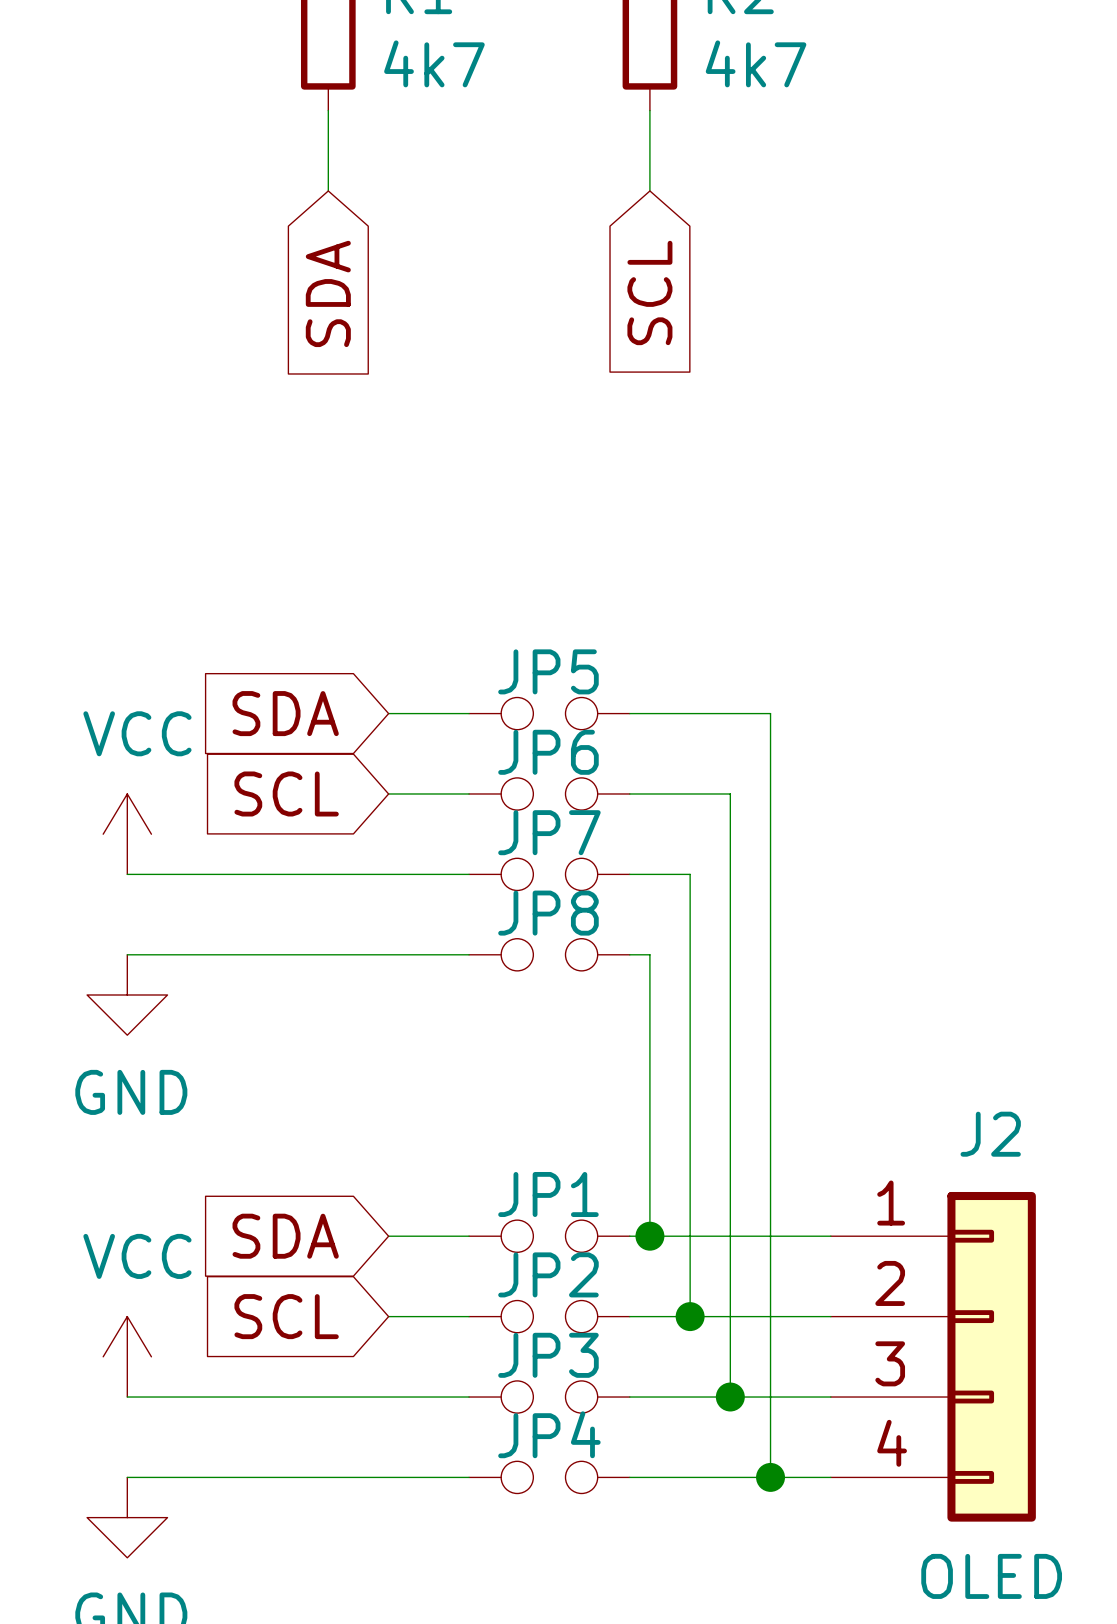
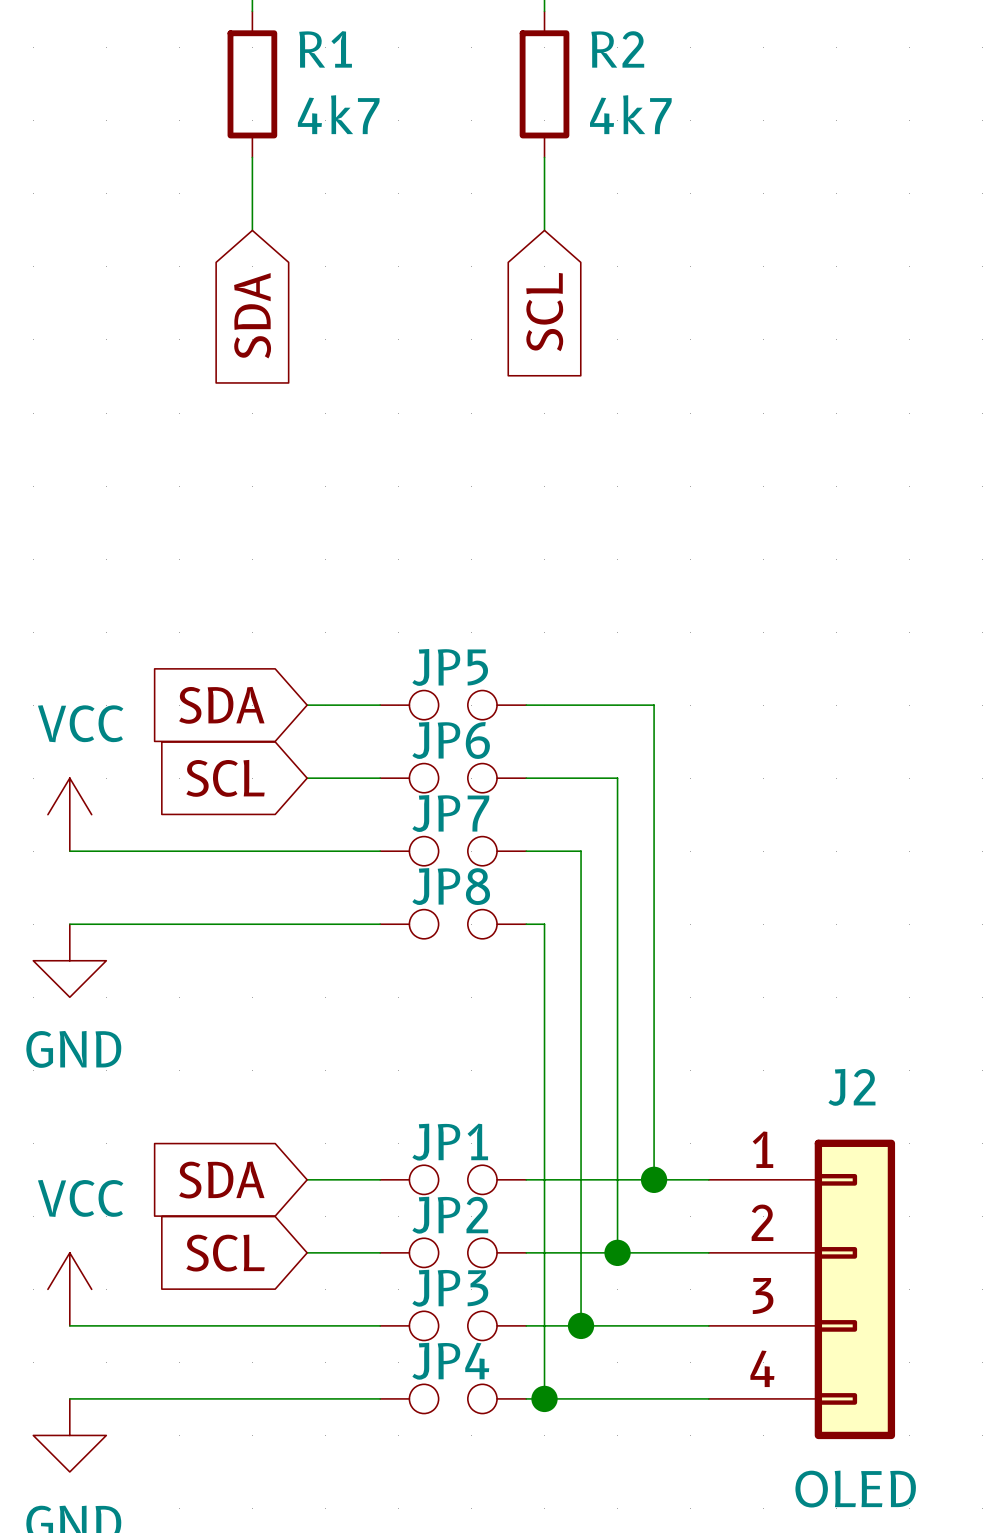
junction: (649, 1236) -> none
wire: (770, 1236) (770, 1477) -> (544, 1179) (544, 1398)
junction: none -> (654, 1179)
junction: (690, 1316) -> none
wire: (730, 1316) (730, 1397) -> (581, 1252) (581, 1325)
junction: none -> (617, 1252)
junction: none -> (581, 1325)
junction: (730, 1397) -> none
junction: none -> (544, 1398)
junction: (770, 1477) -> none

